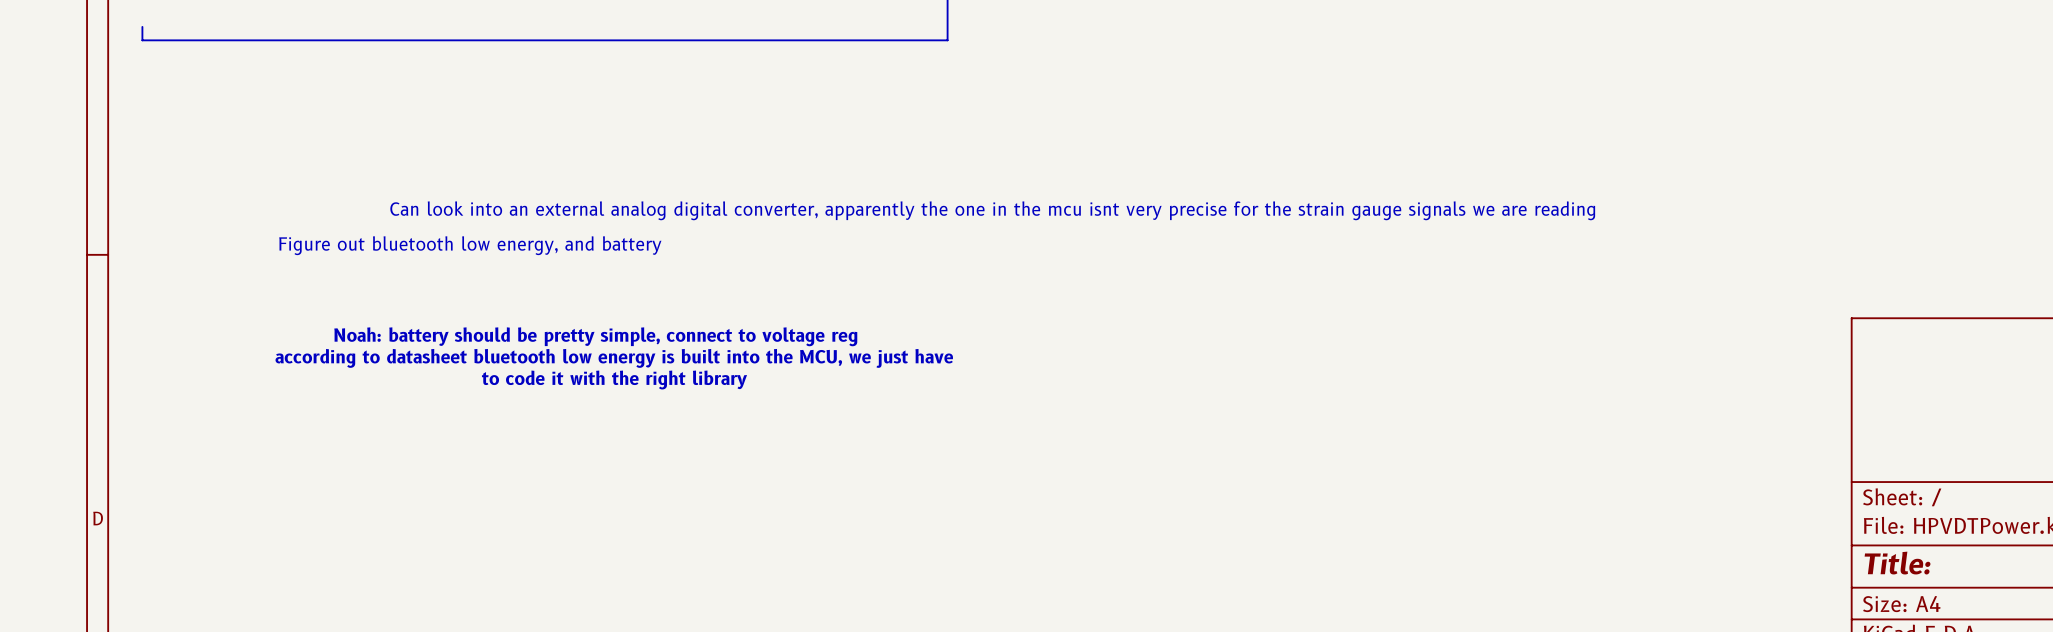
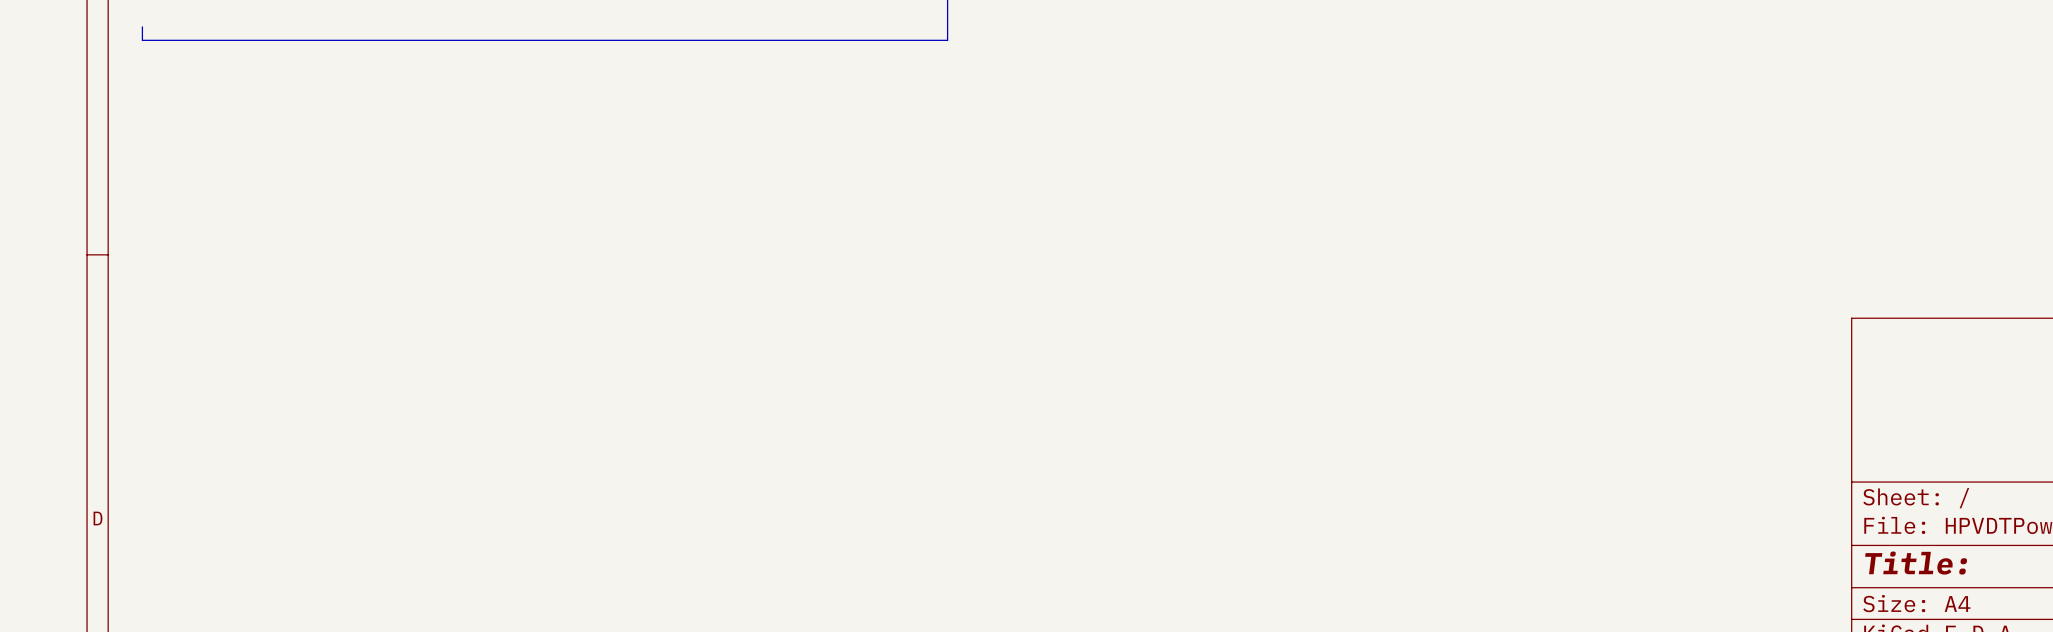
text: Can look into an external analog digital converter, apparently the one in the mcu isnt very precise for the strain gauge signals we are reading (992, 210) -> none
text: Figure out bluetooth low energy, and battery (470, 245) -> none
text: Noah: battery should be pretty simple, connect to voltage reg (595, 336) -> none
text: according to datasheet bluetooth low energy is built into the MCU, we just have (614, 358) -> none
text: to code it with the right library (614, 380) -> none

